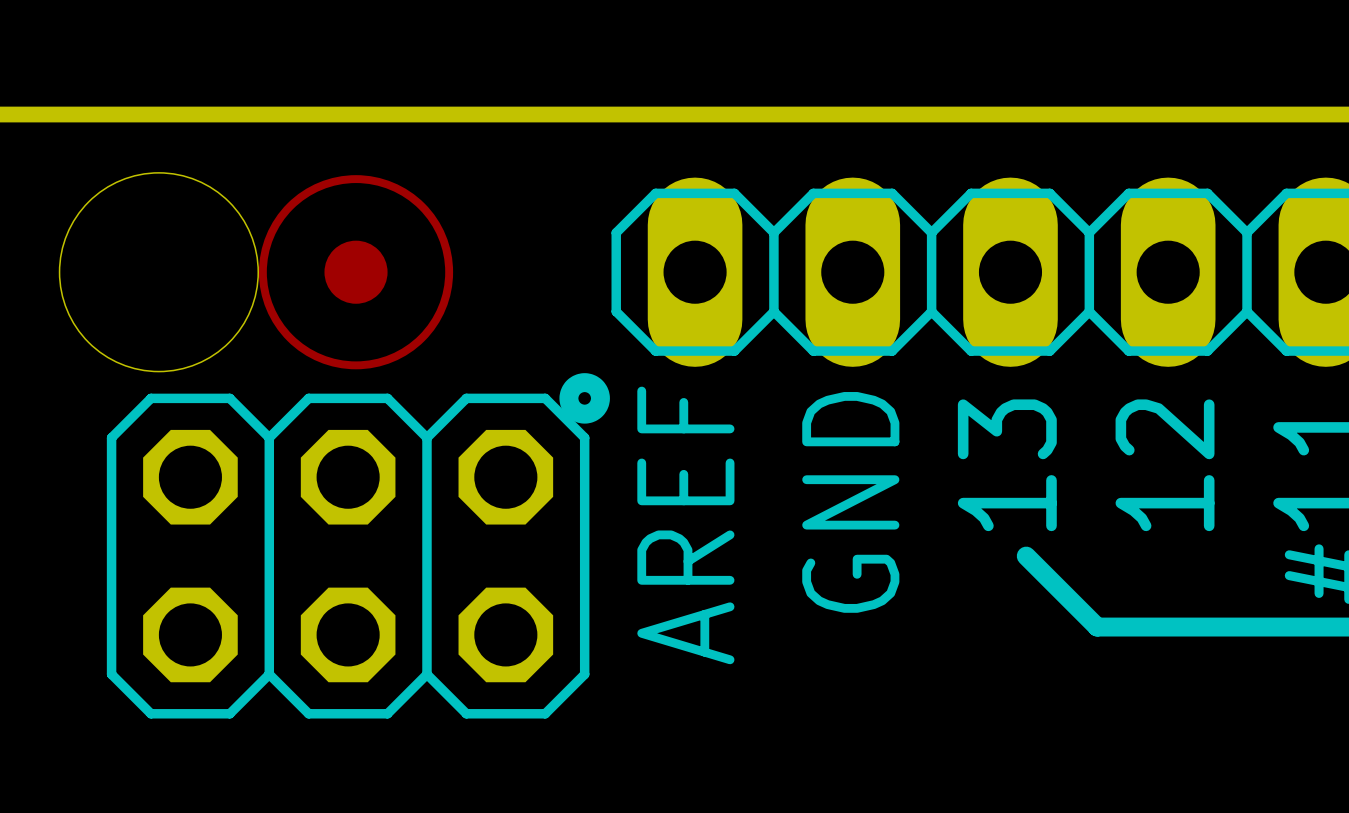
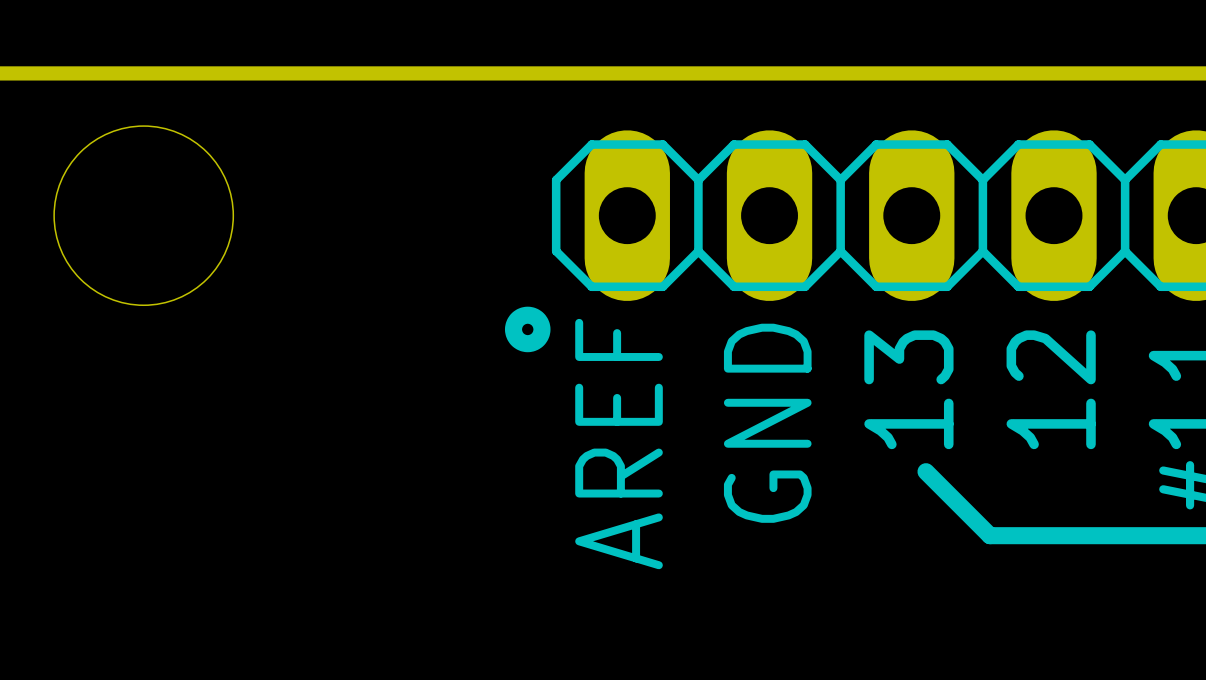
part: (356, 272) -> none
part: (348, 556) -> none

